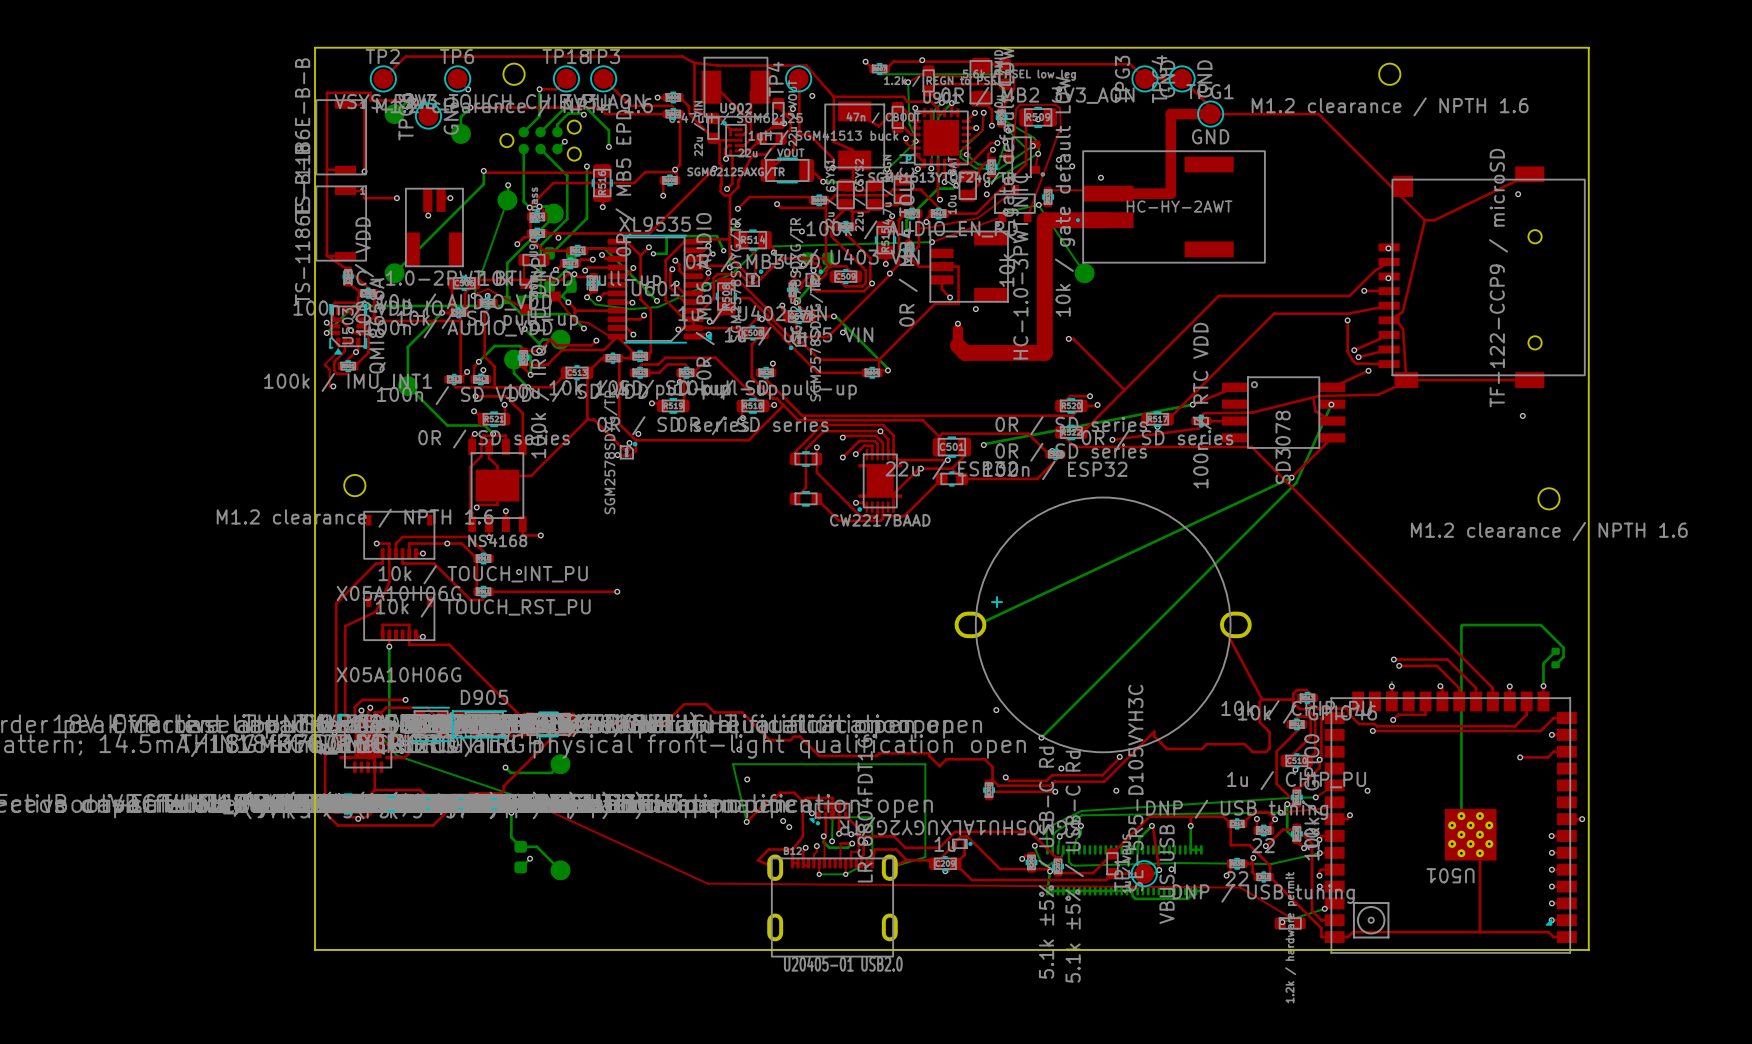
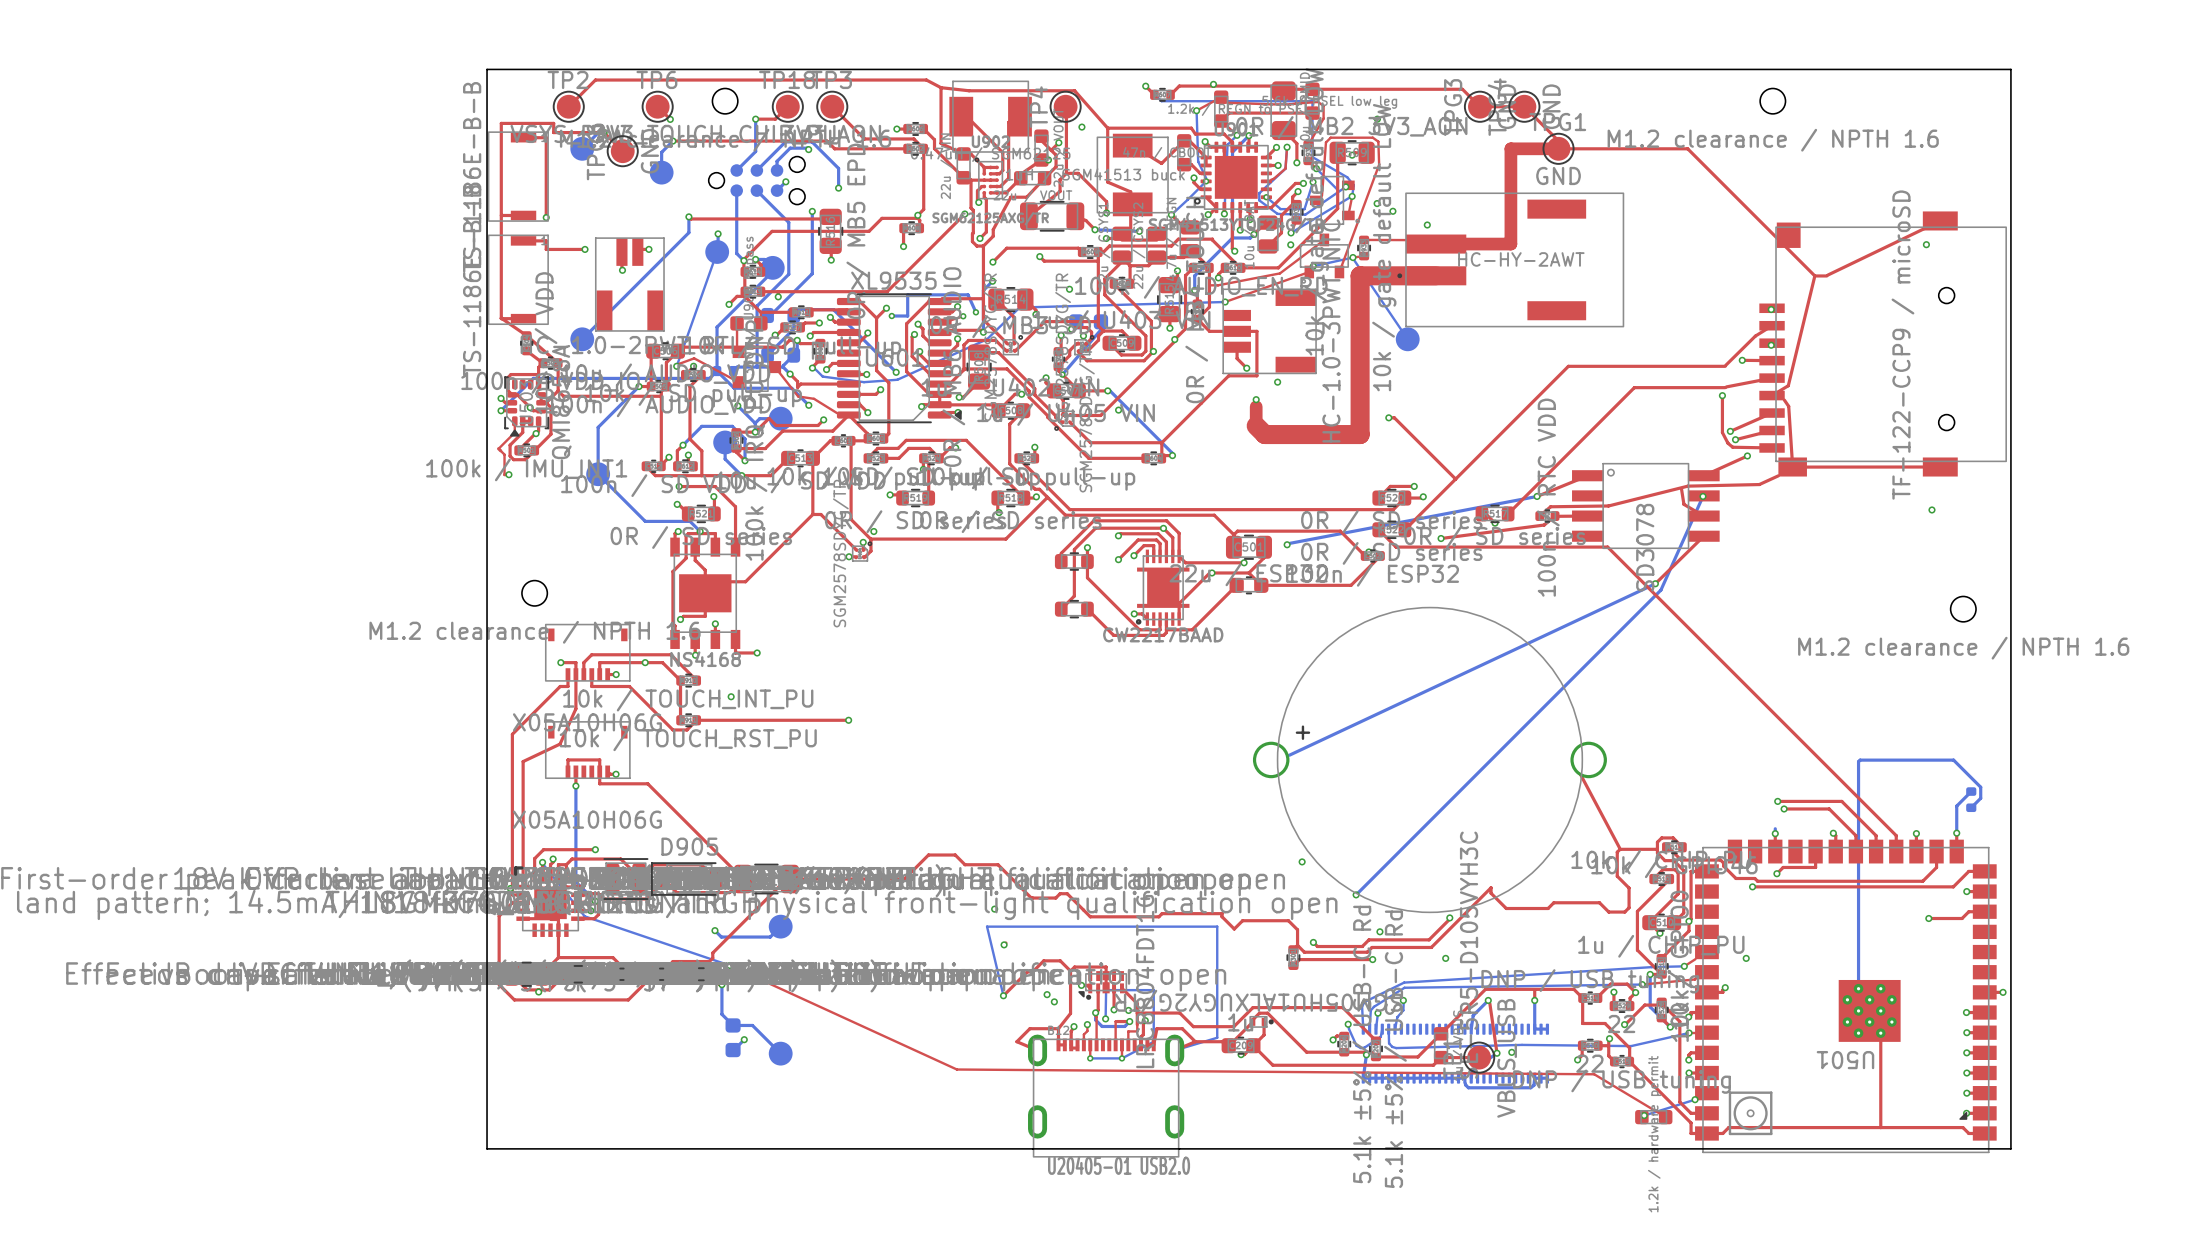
part footprint: [954, 496, 1252, 753] -> [1252, 606, 1607, 914]

